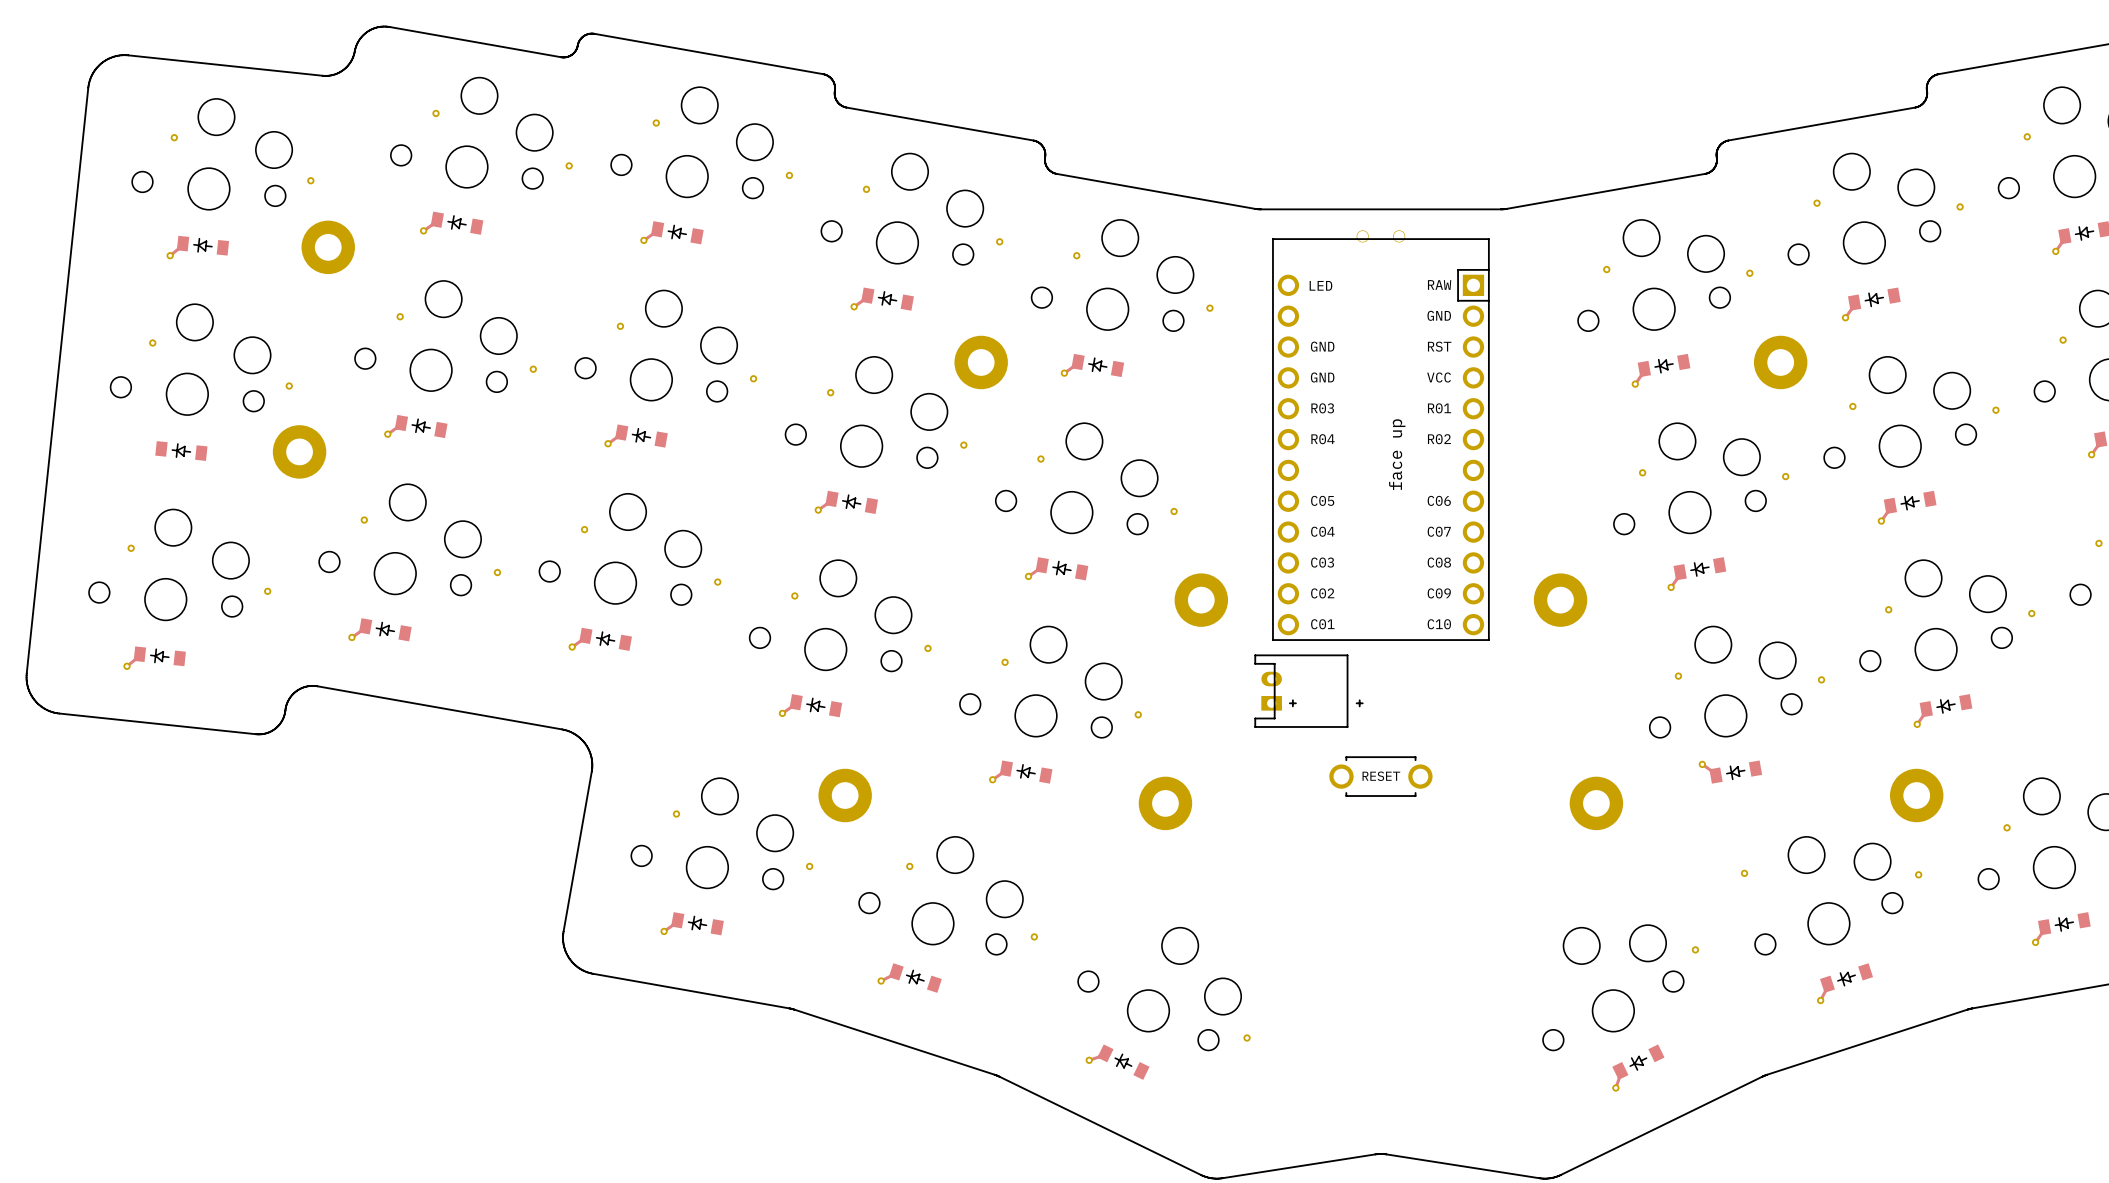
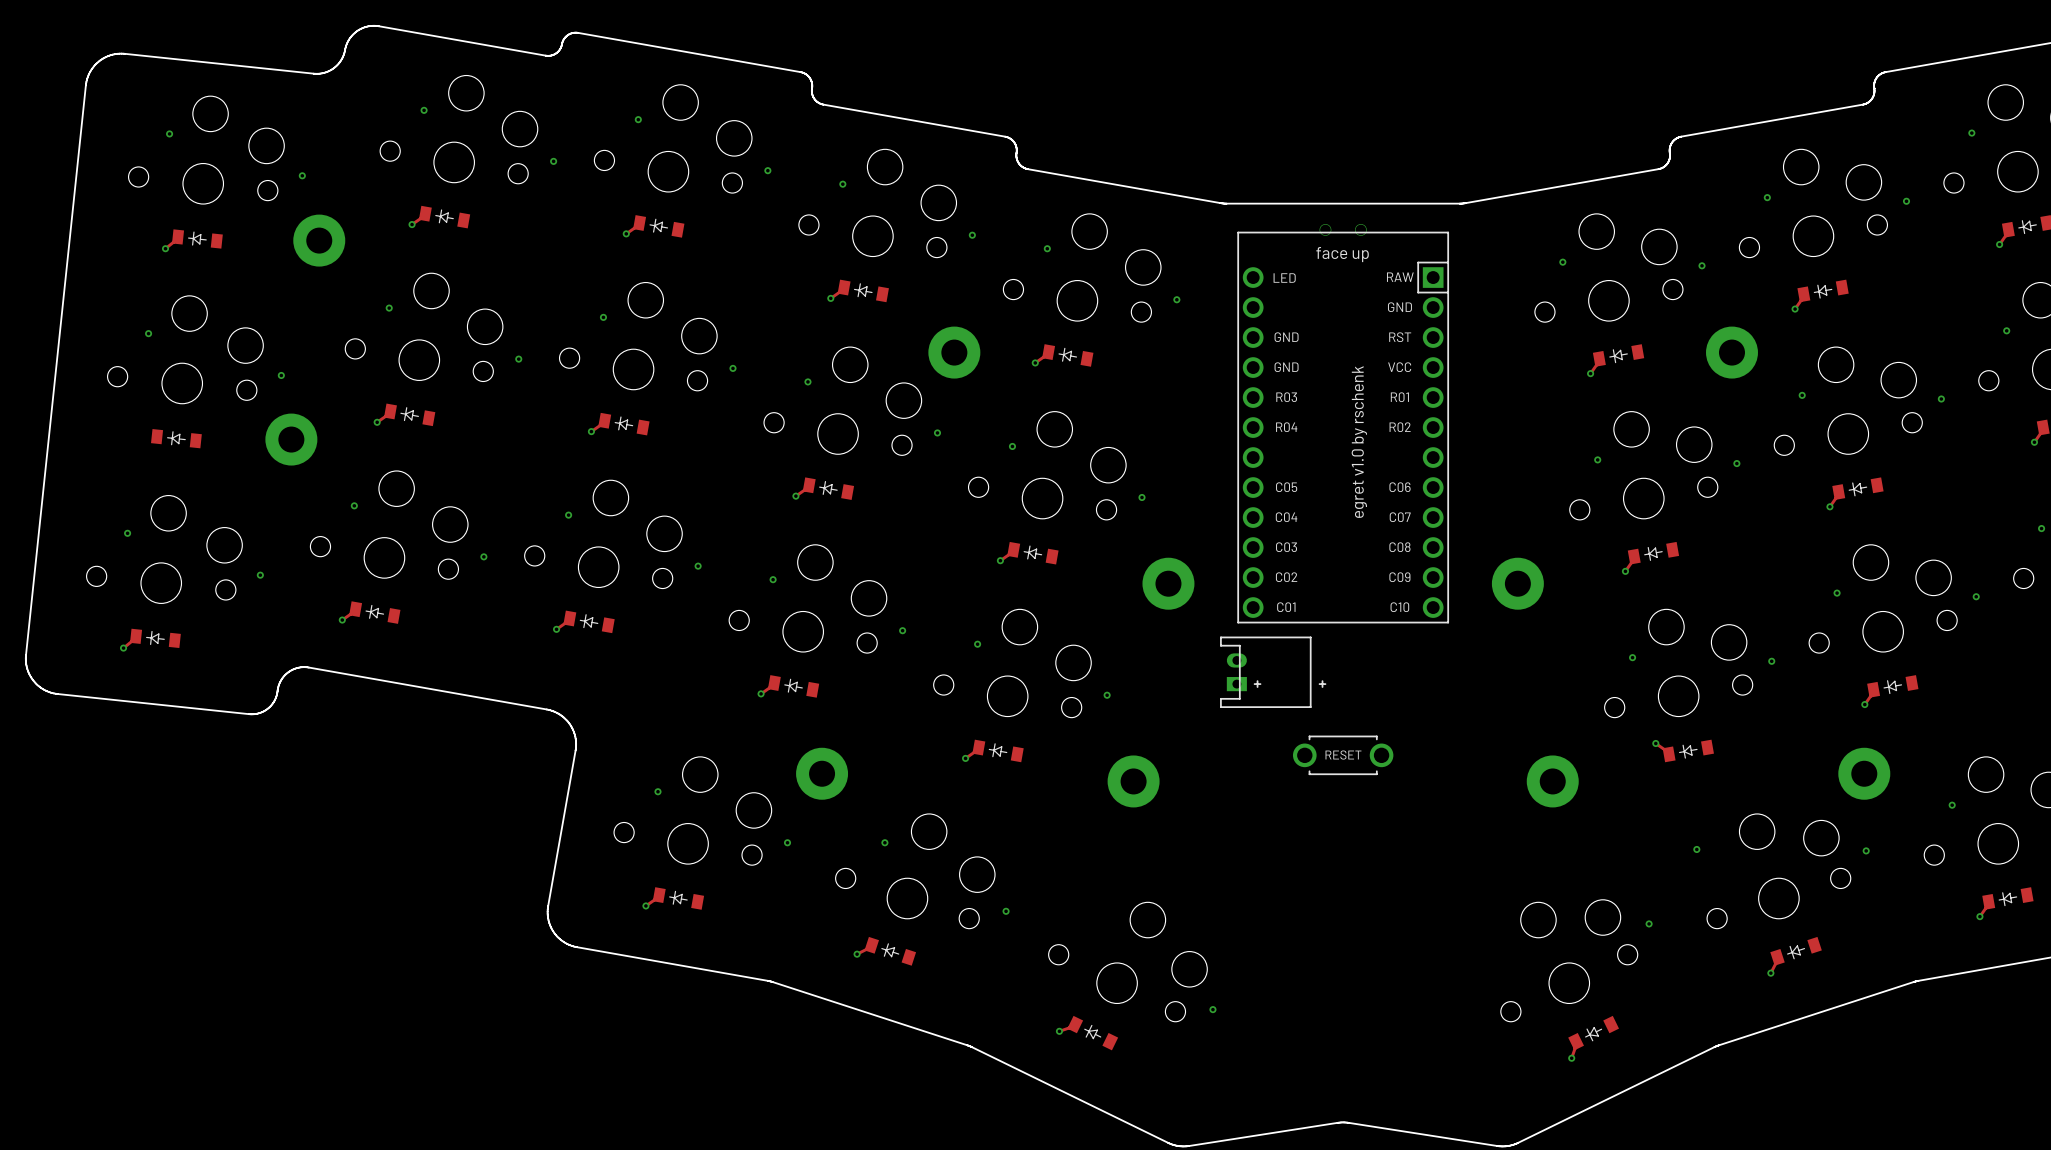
text: none -> face up (1342, 254)
text: face up (1397, 454) -> egret v1.0 by rschenk (1359, 442)

